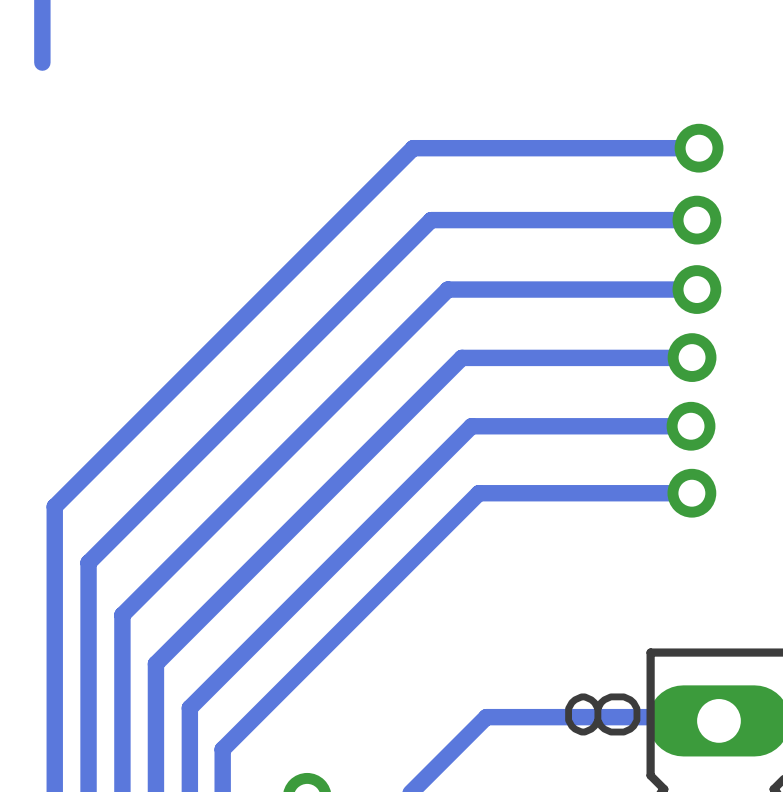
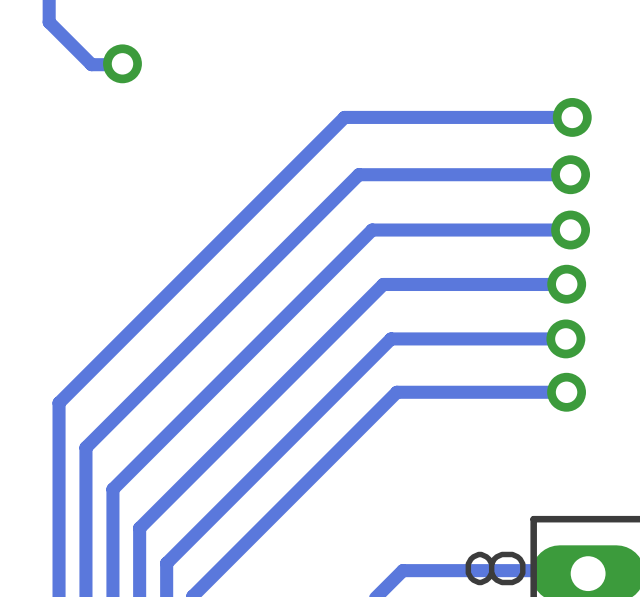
track: (42, 28) (42, 62) -> (49, 22) (91, 64) (122, 63)
via: none -> (122, 63)

